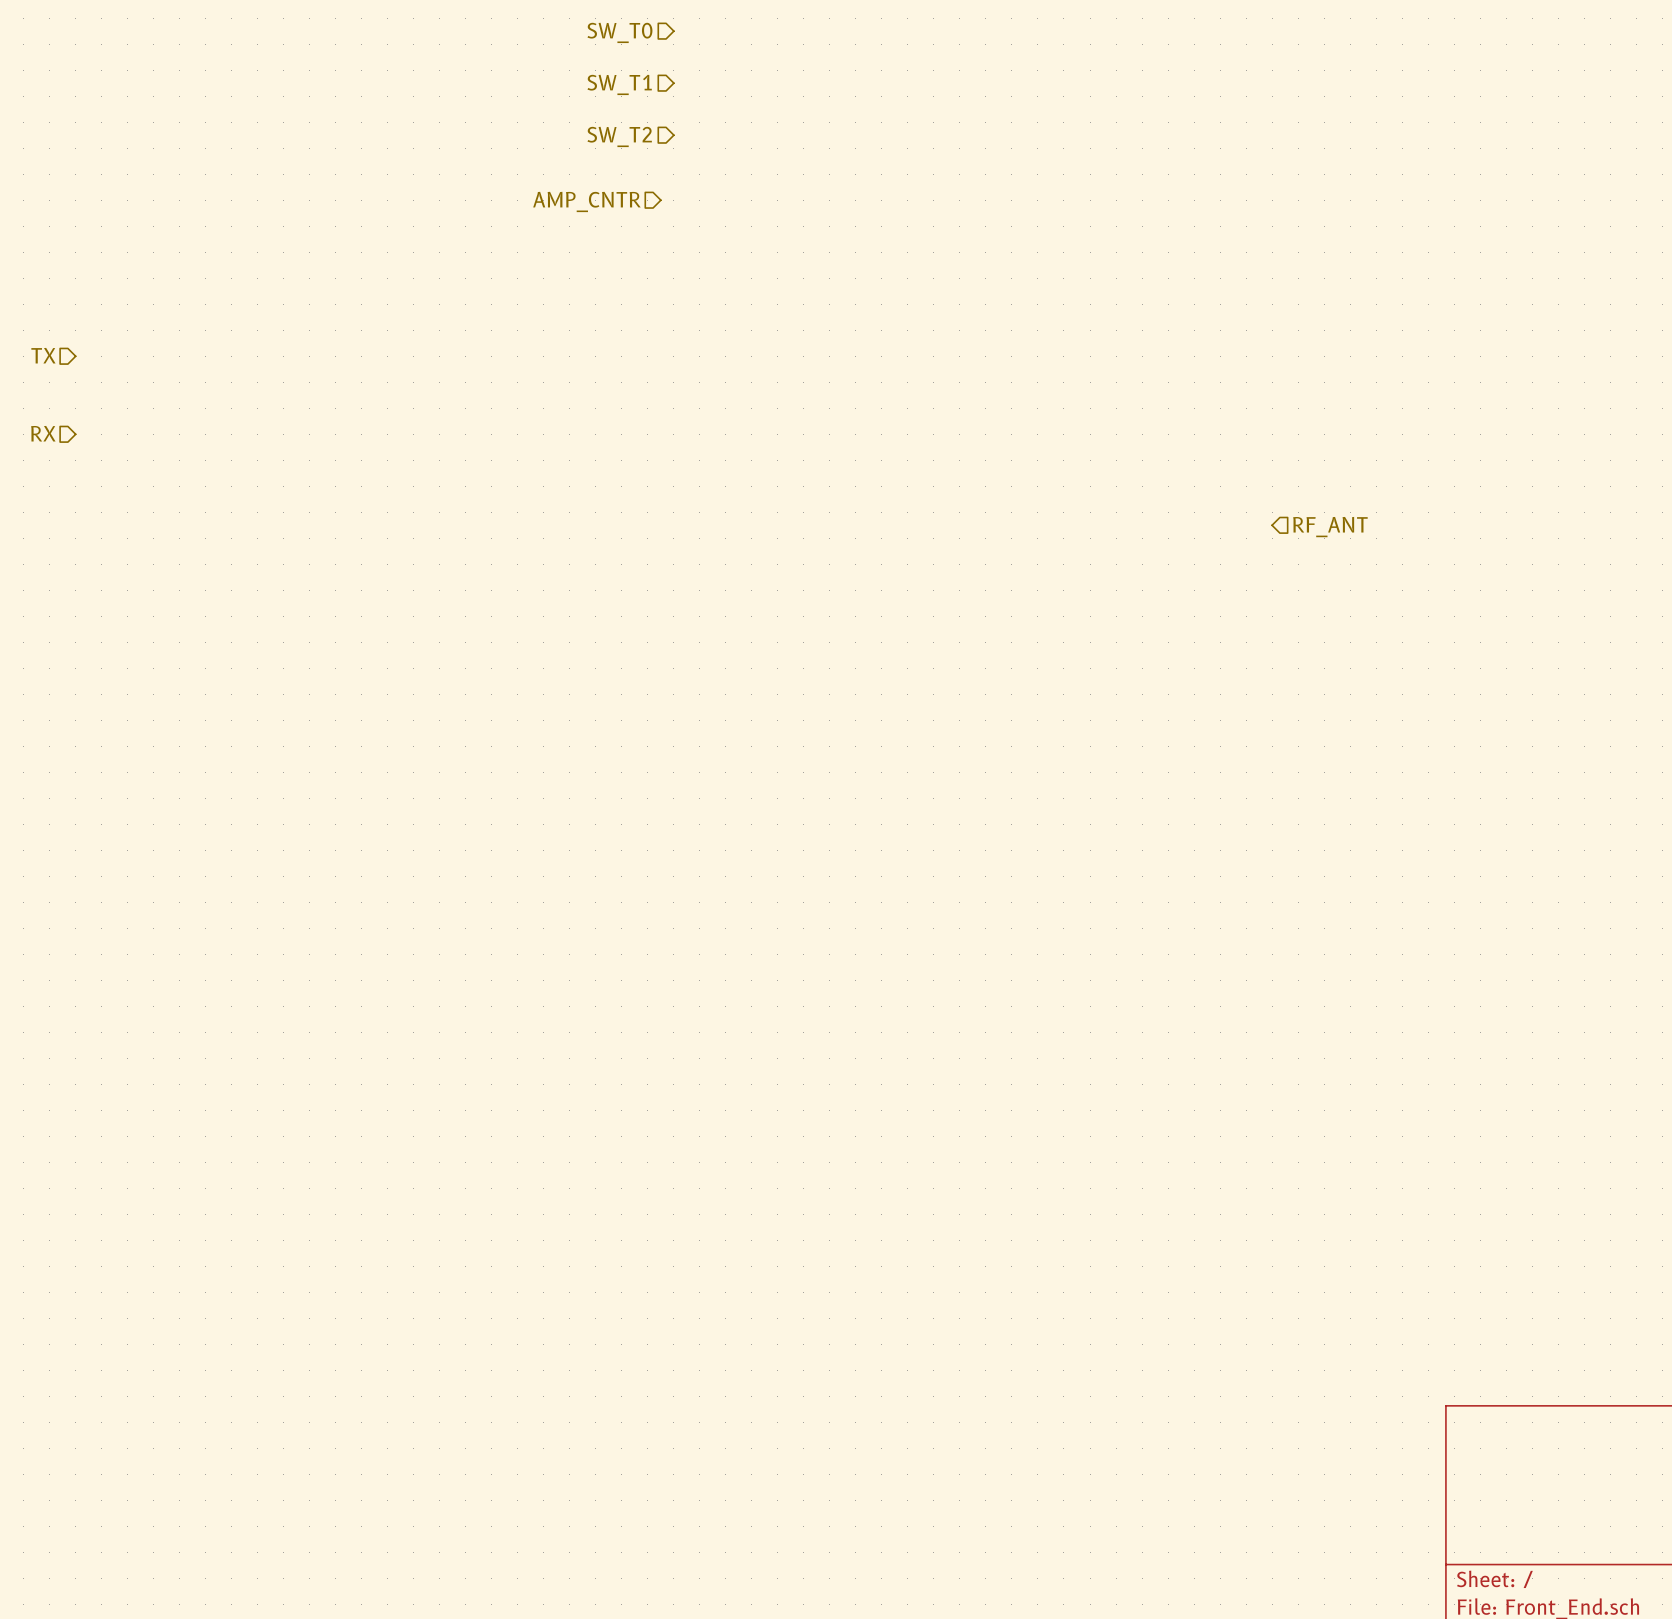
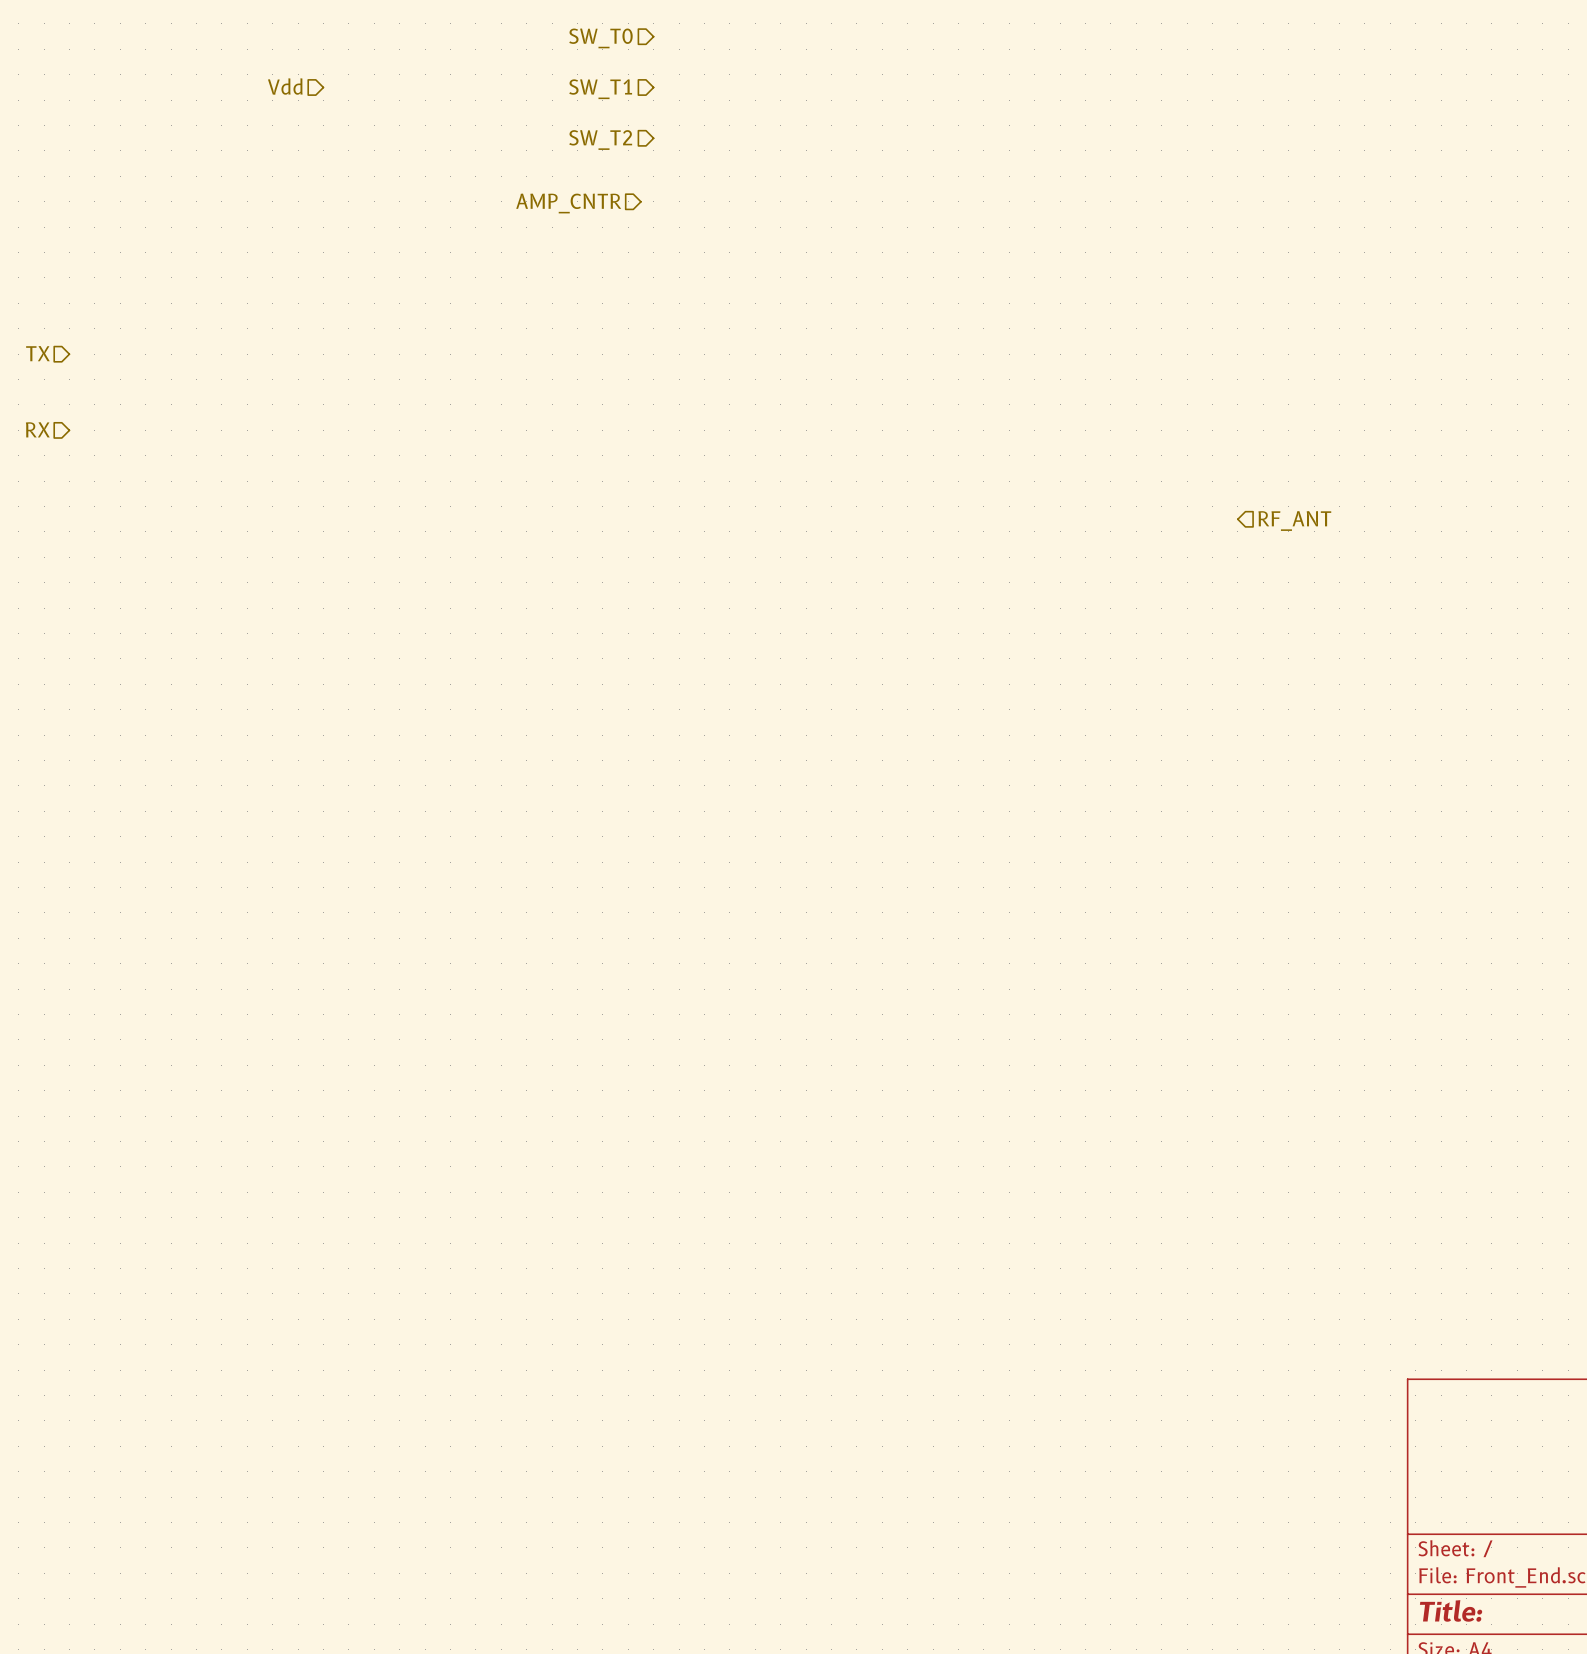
hierarchical label: none -> Vdd (285, 86)

